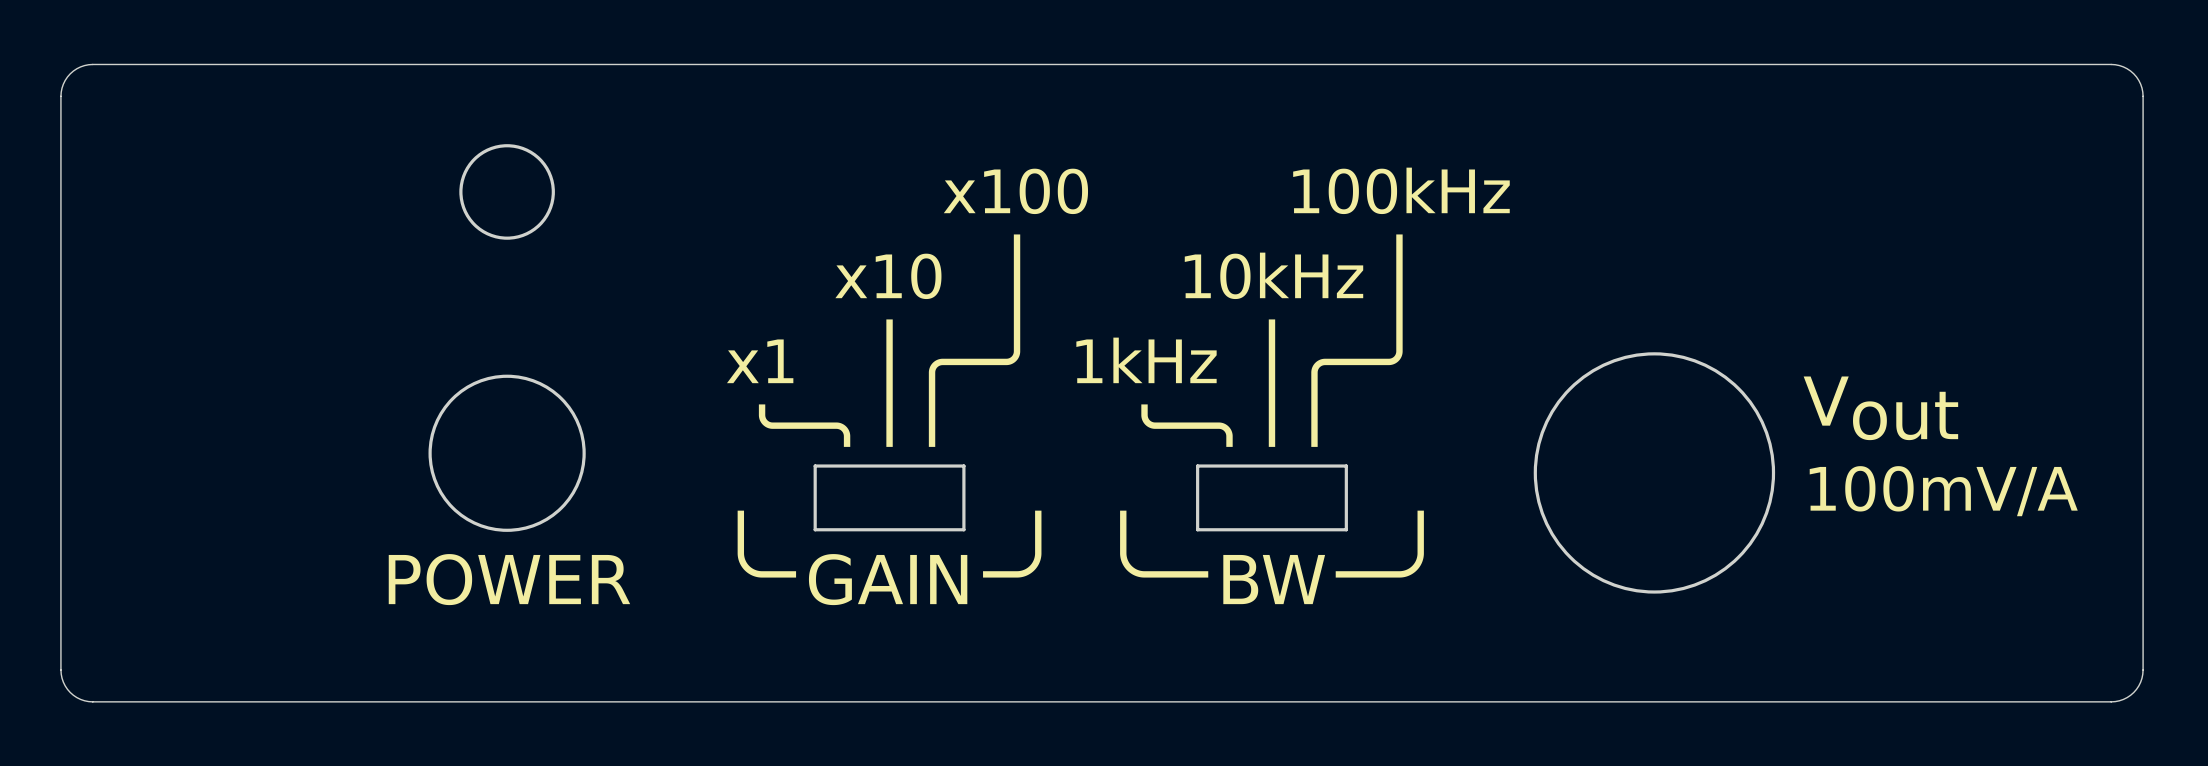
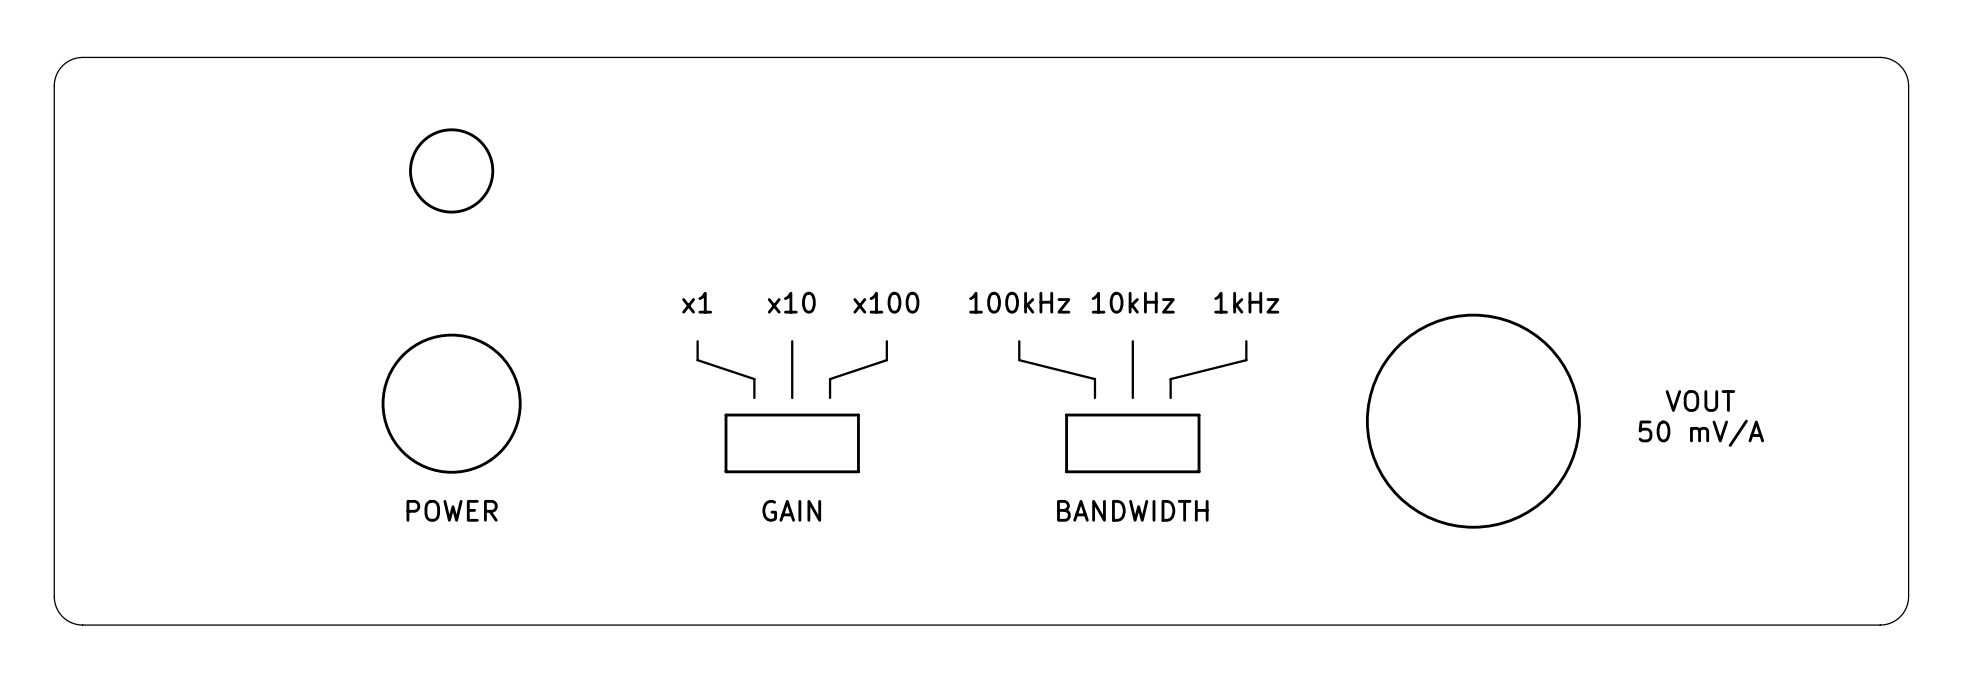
drawing: [388, 167, 2078, 606] -> none
text: none -> x1 (697, 302)
text: none -> x10 (791, 302)
text: none -> x100 (886, 302)
text: none -> 100kHz (1019, 302)
text: none -> 10kHz (1133, 302)
text: none -> 1kHz (1246, 302)
line: none -> (697, 341) (697, 360) (754, 379) (754, 398)
line: none -> (792, 341) (792, 398)
line: none -> (886, 341) (886, 360) (830, 379) (830, 398)
line: none -> (1019, 341) (1019, 360) (1094, 379) (1094, 398)
line: none -> (1132, 341) (1132, 398)
line: none -> (1246, 341) (1246, 360) (1170, 379) (1170, 398)
text: none -> VOUT (1700, 400)
text: none -> 50 mV/A (1701, 433)
text: none -> POWER (452, 510)
text: none -> GAIN (791, 510)
text: none -> BANDWIDTH (1132, 510)

